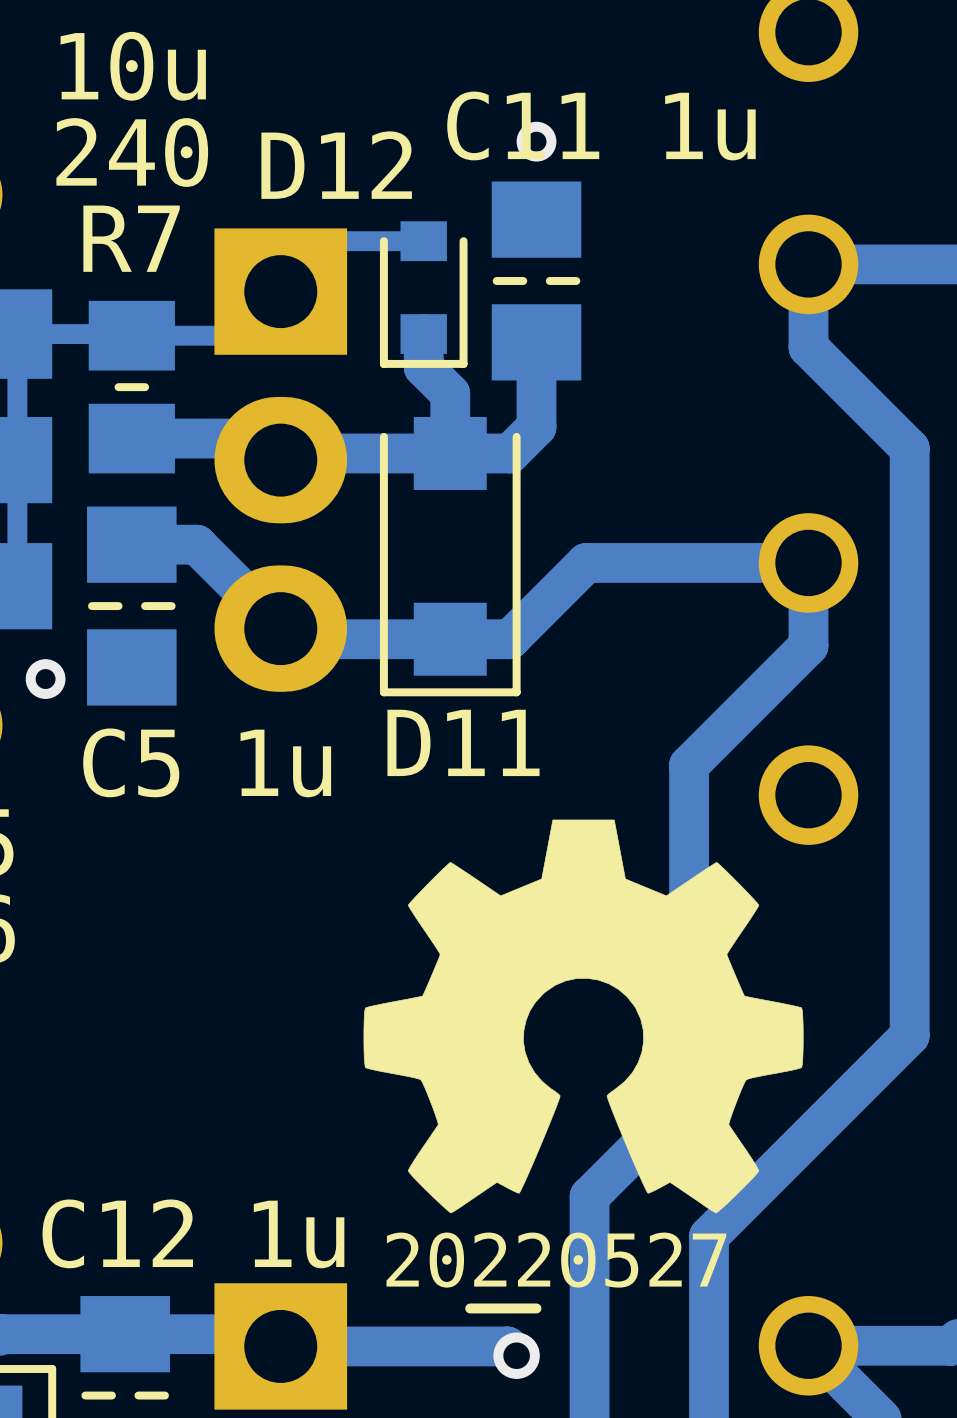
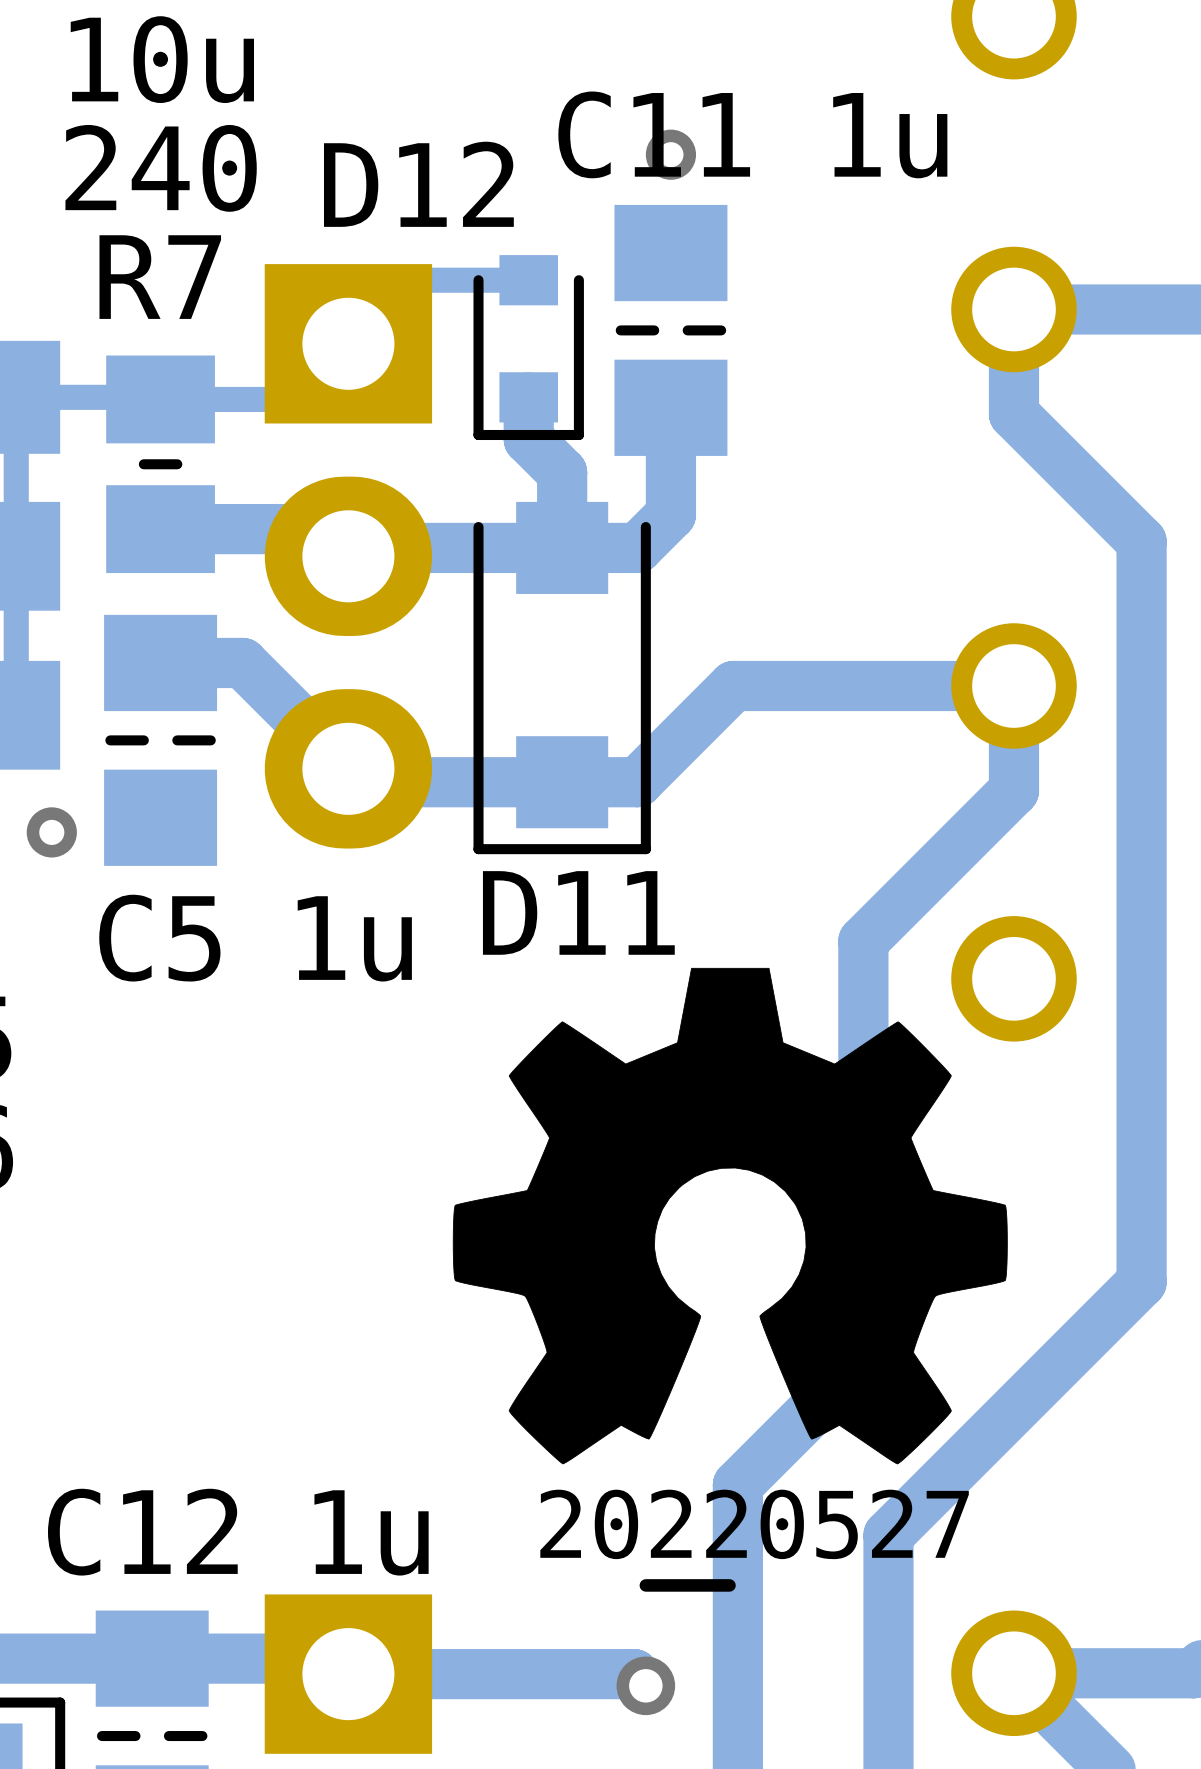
drawing position: (583, 1016) -> (730, 1216)
drawing position: (503, 1308) -> (687, 1585)

